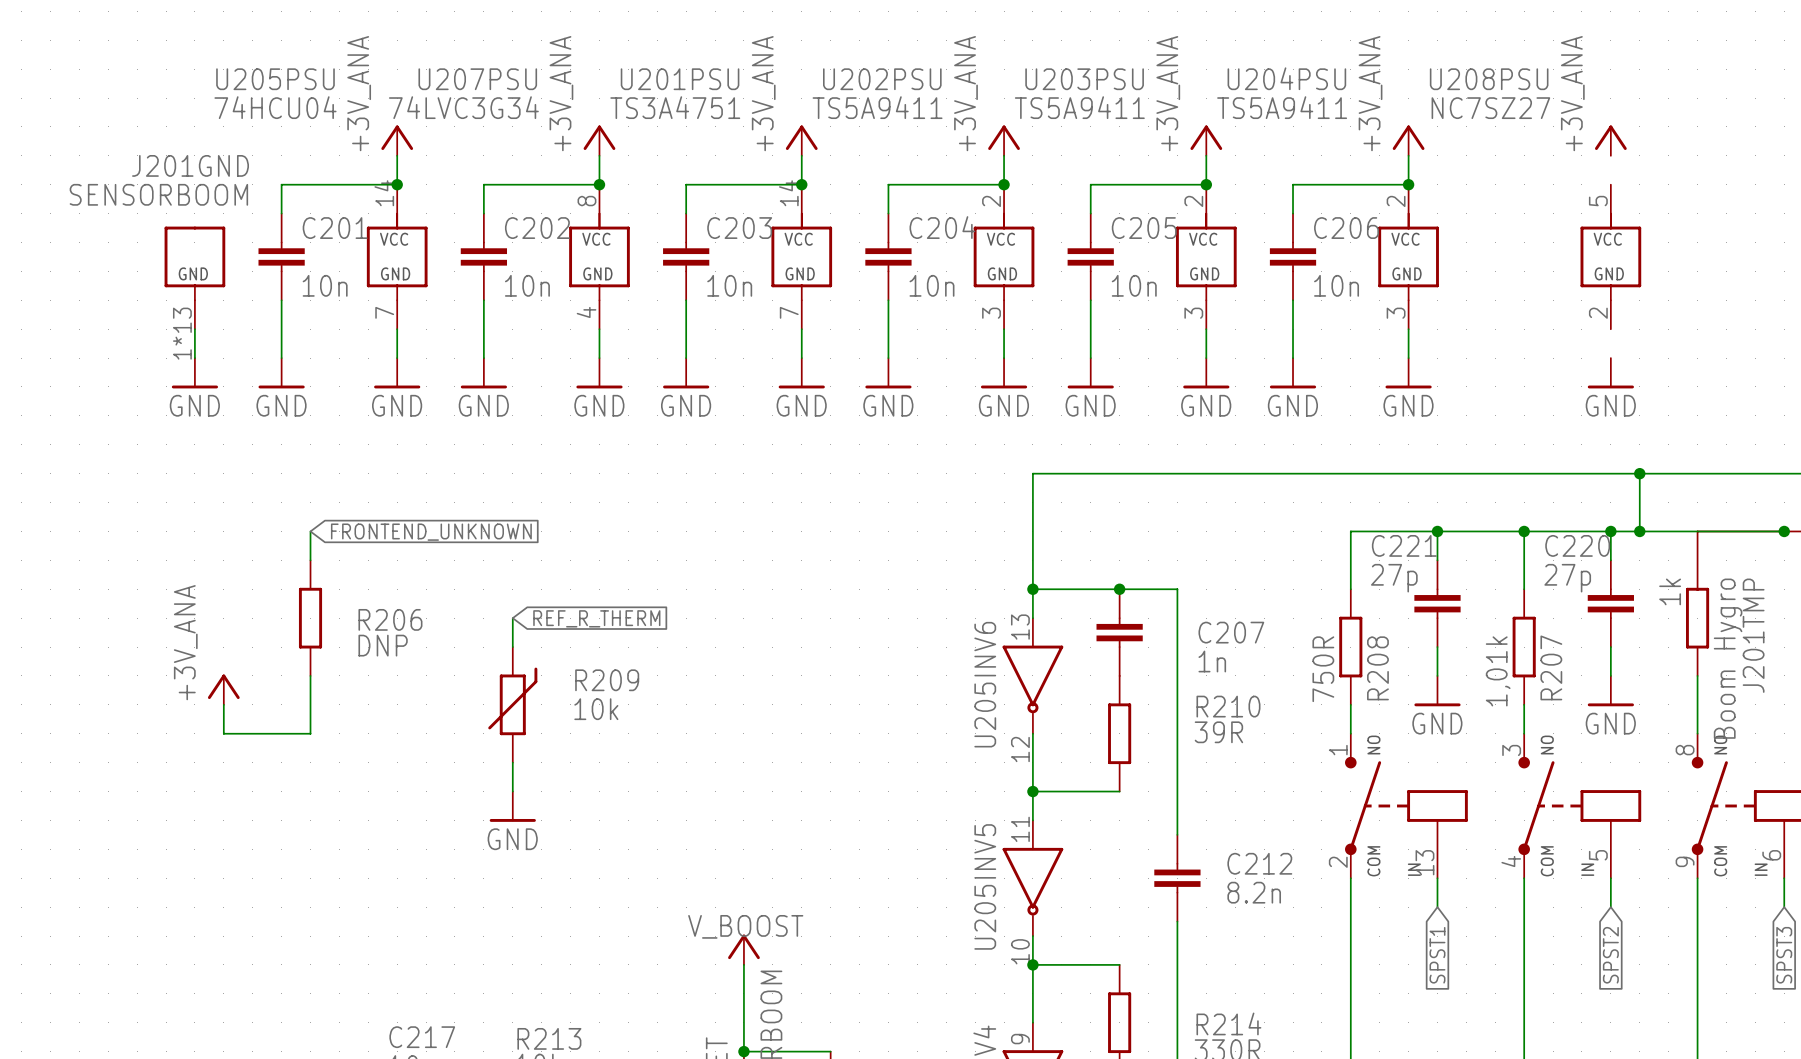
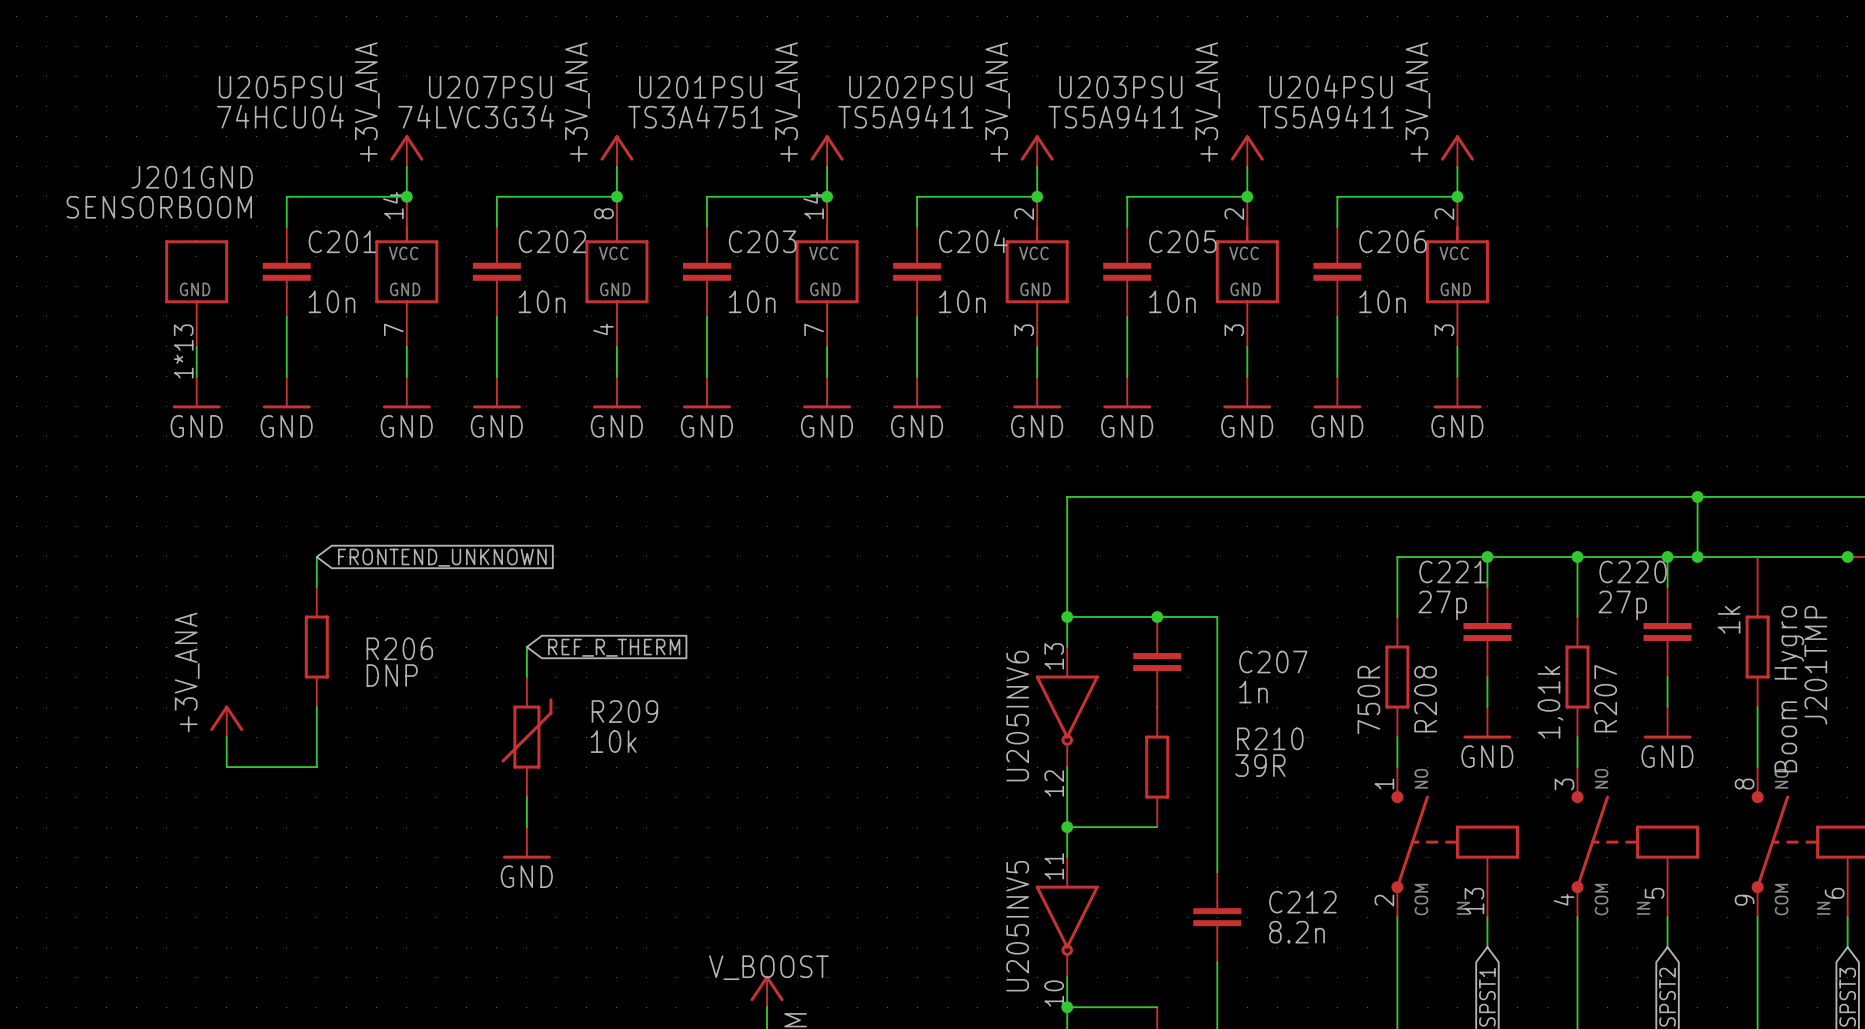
power symbol: +3V_ANA (1610, 140) -> none
U208PSU: NC7SZ27 (1610, 256) -> none
power symbol: GND (1610, 373) -> none

